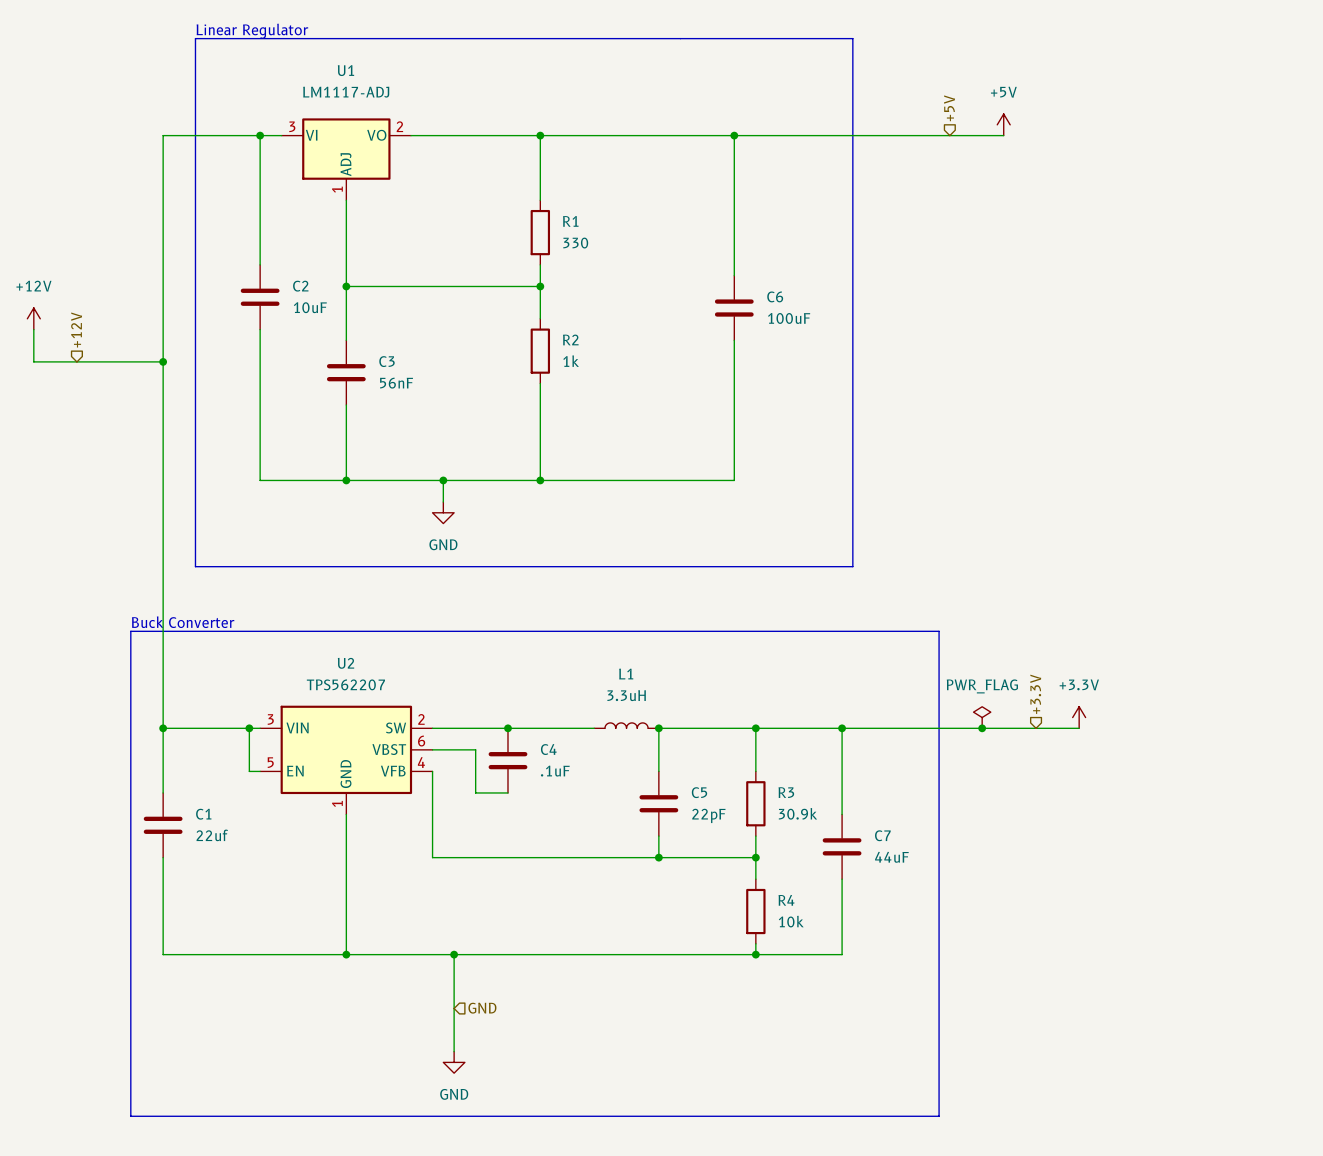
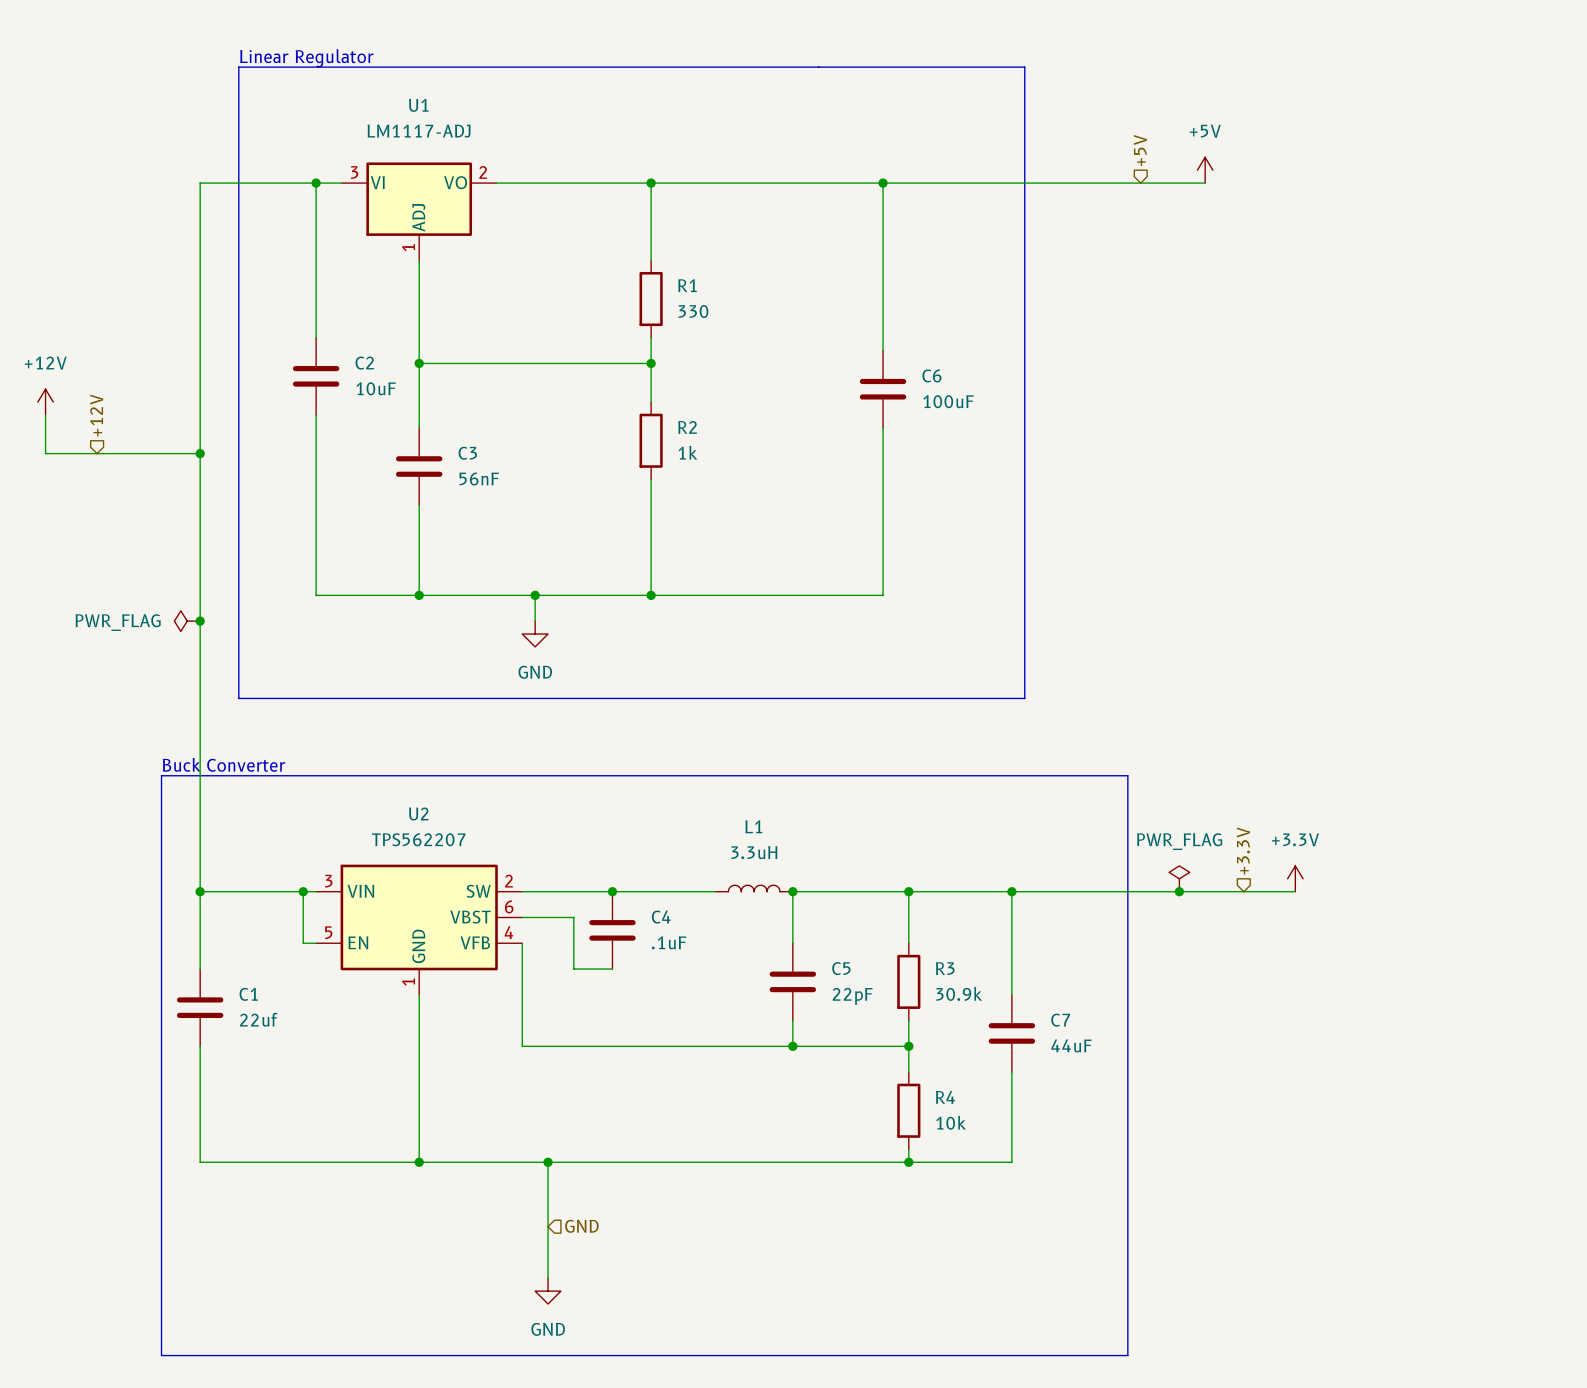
power symbol: none -> PWR_FLAG (187, 621)
junction: none -> (200, 621)

